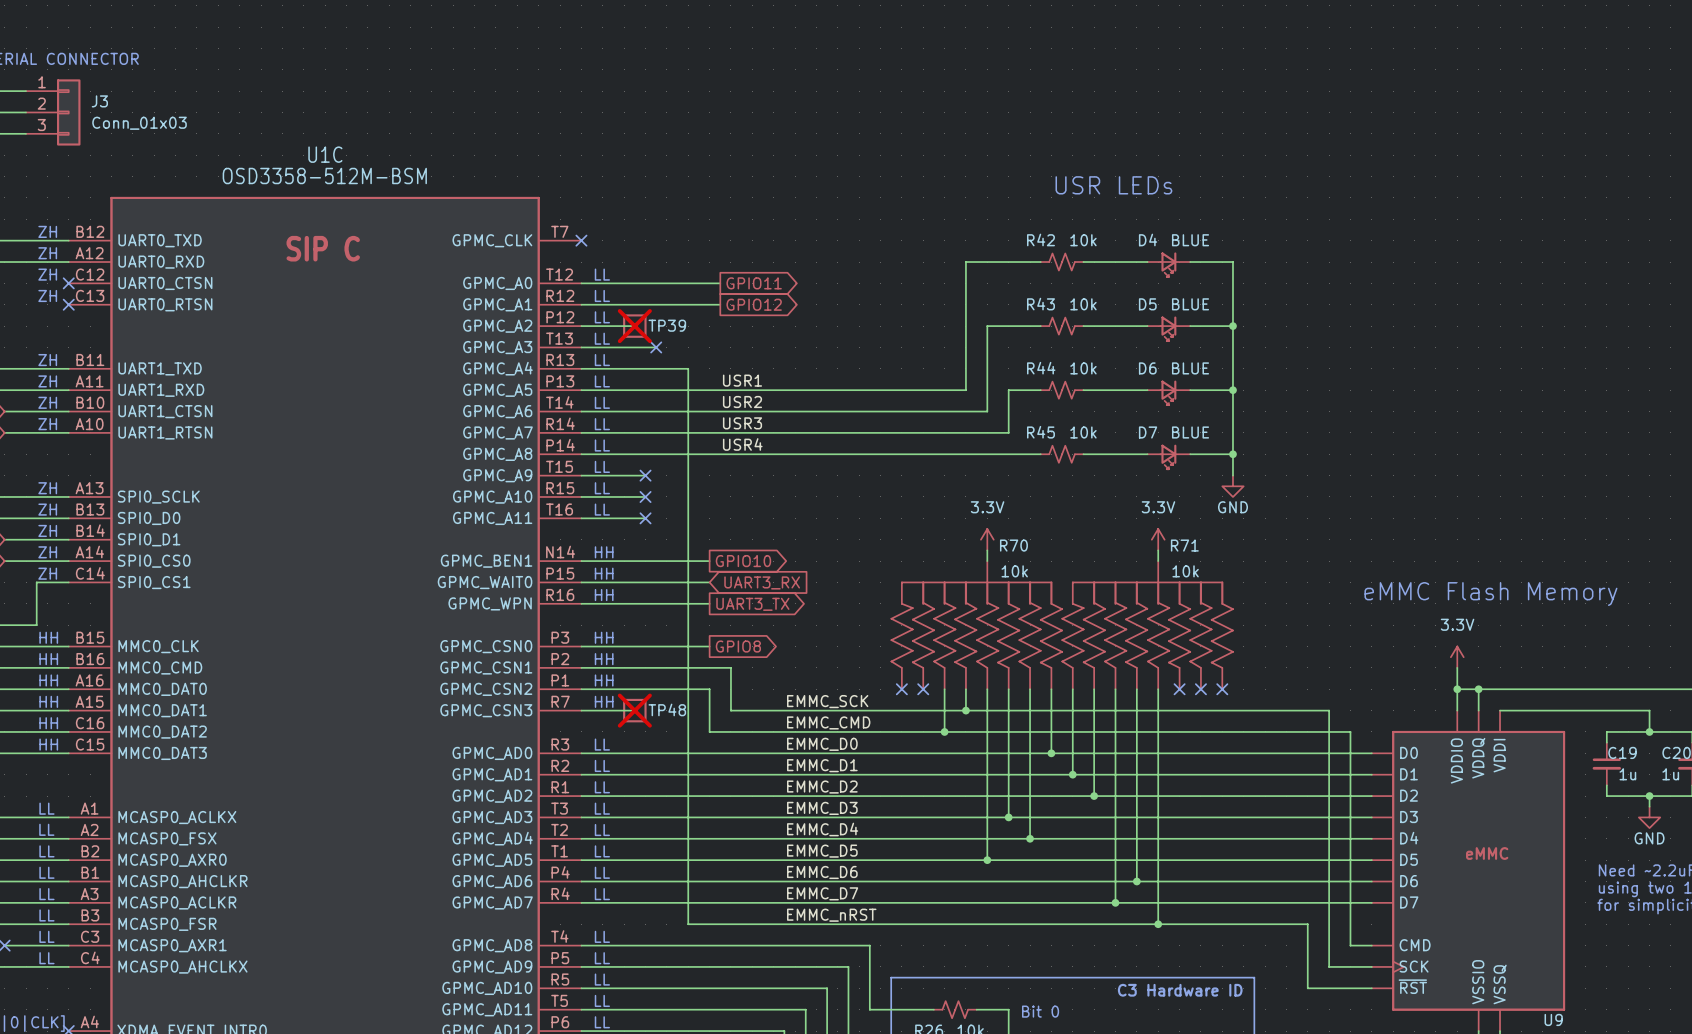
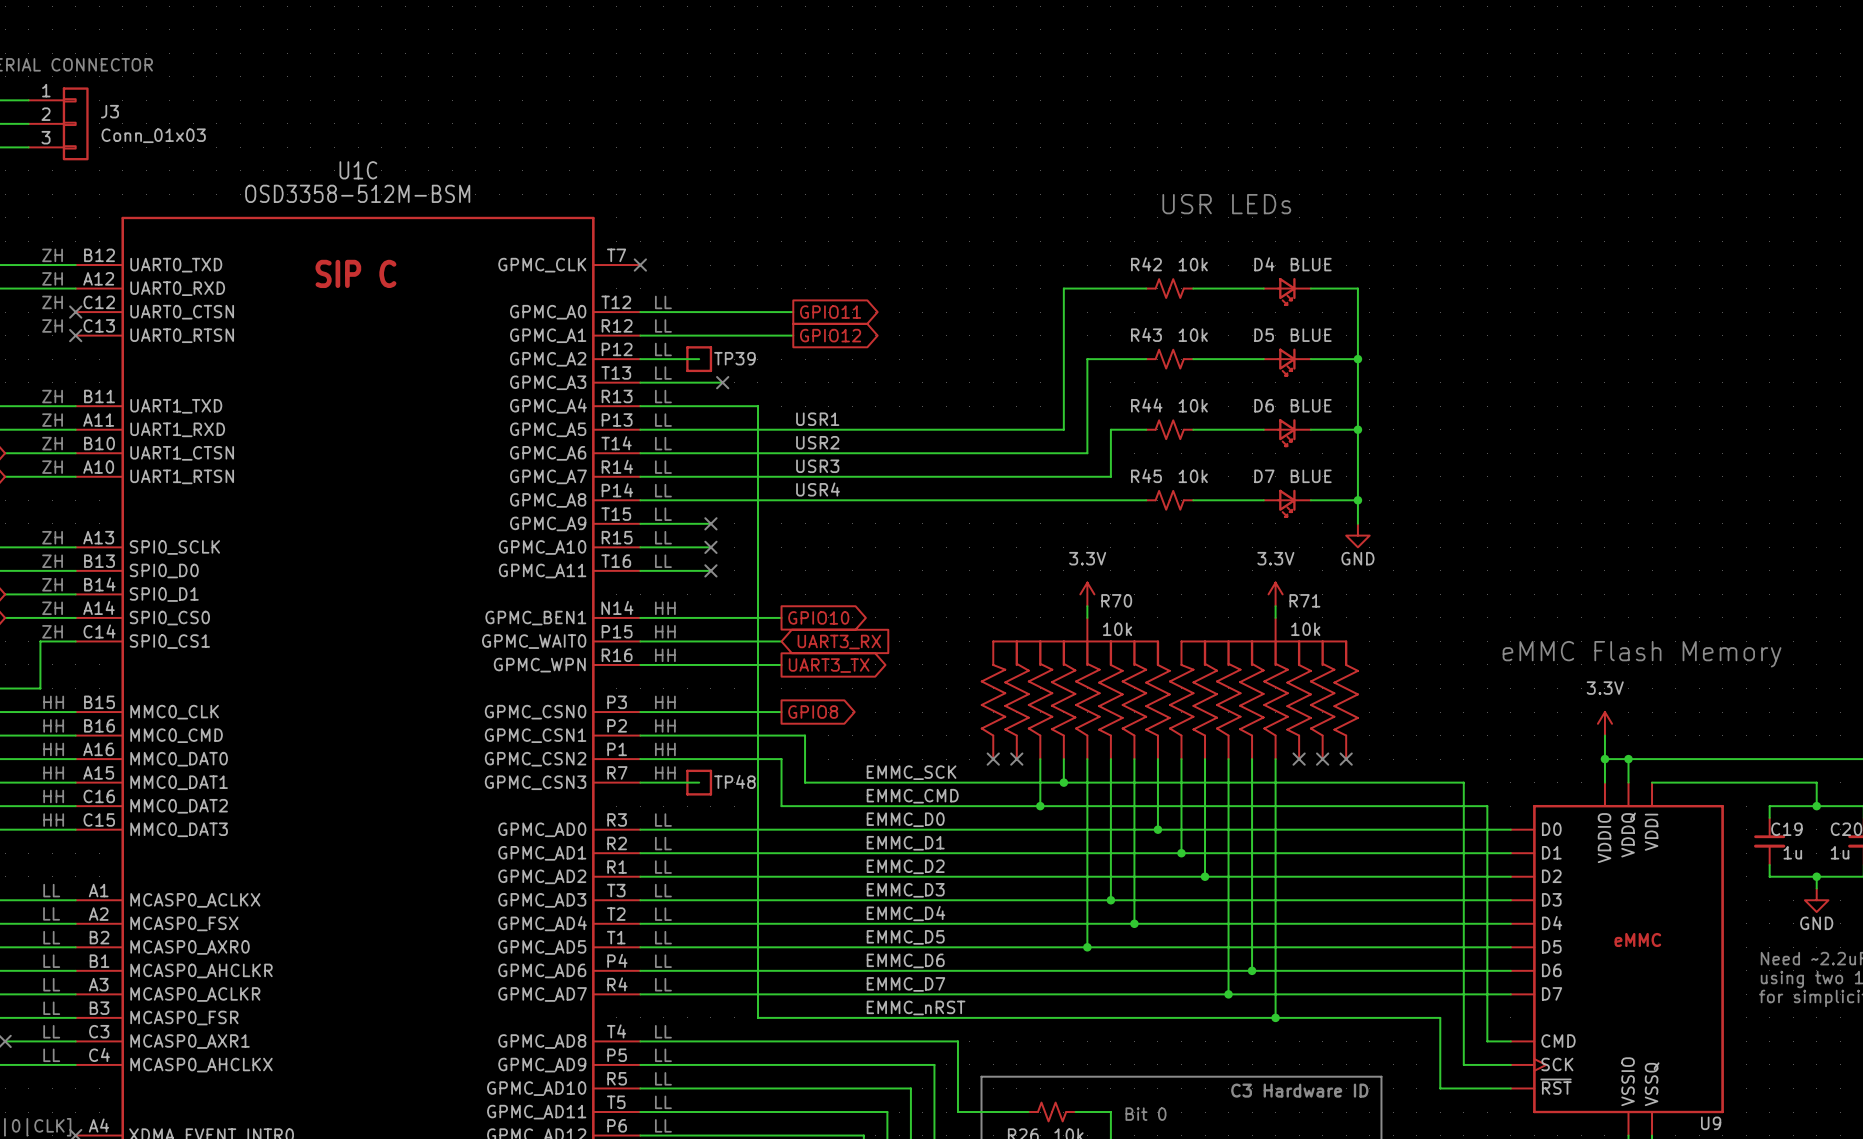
TP39 do-not-place cross: (634, 326) -> none
TP48 do-not-place cross: (634, 710) -> none

